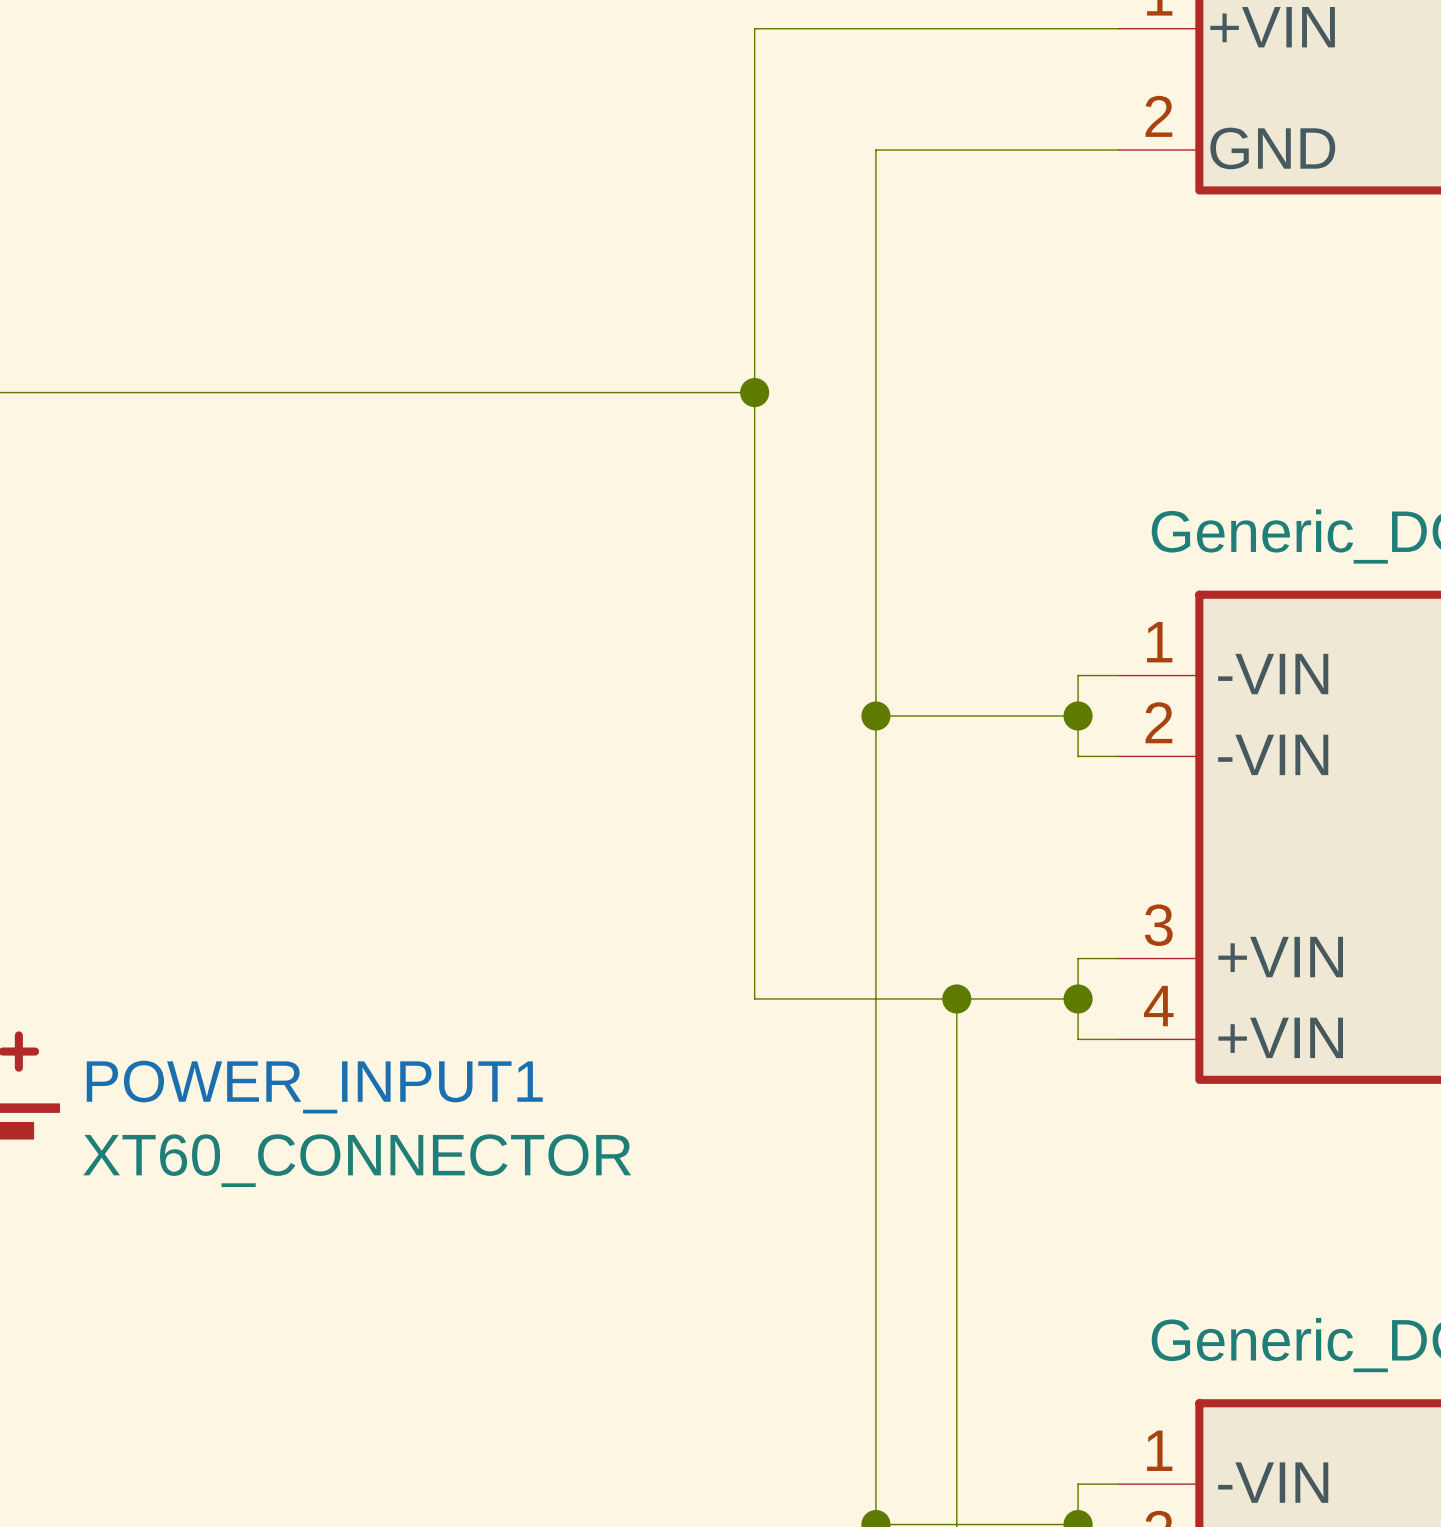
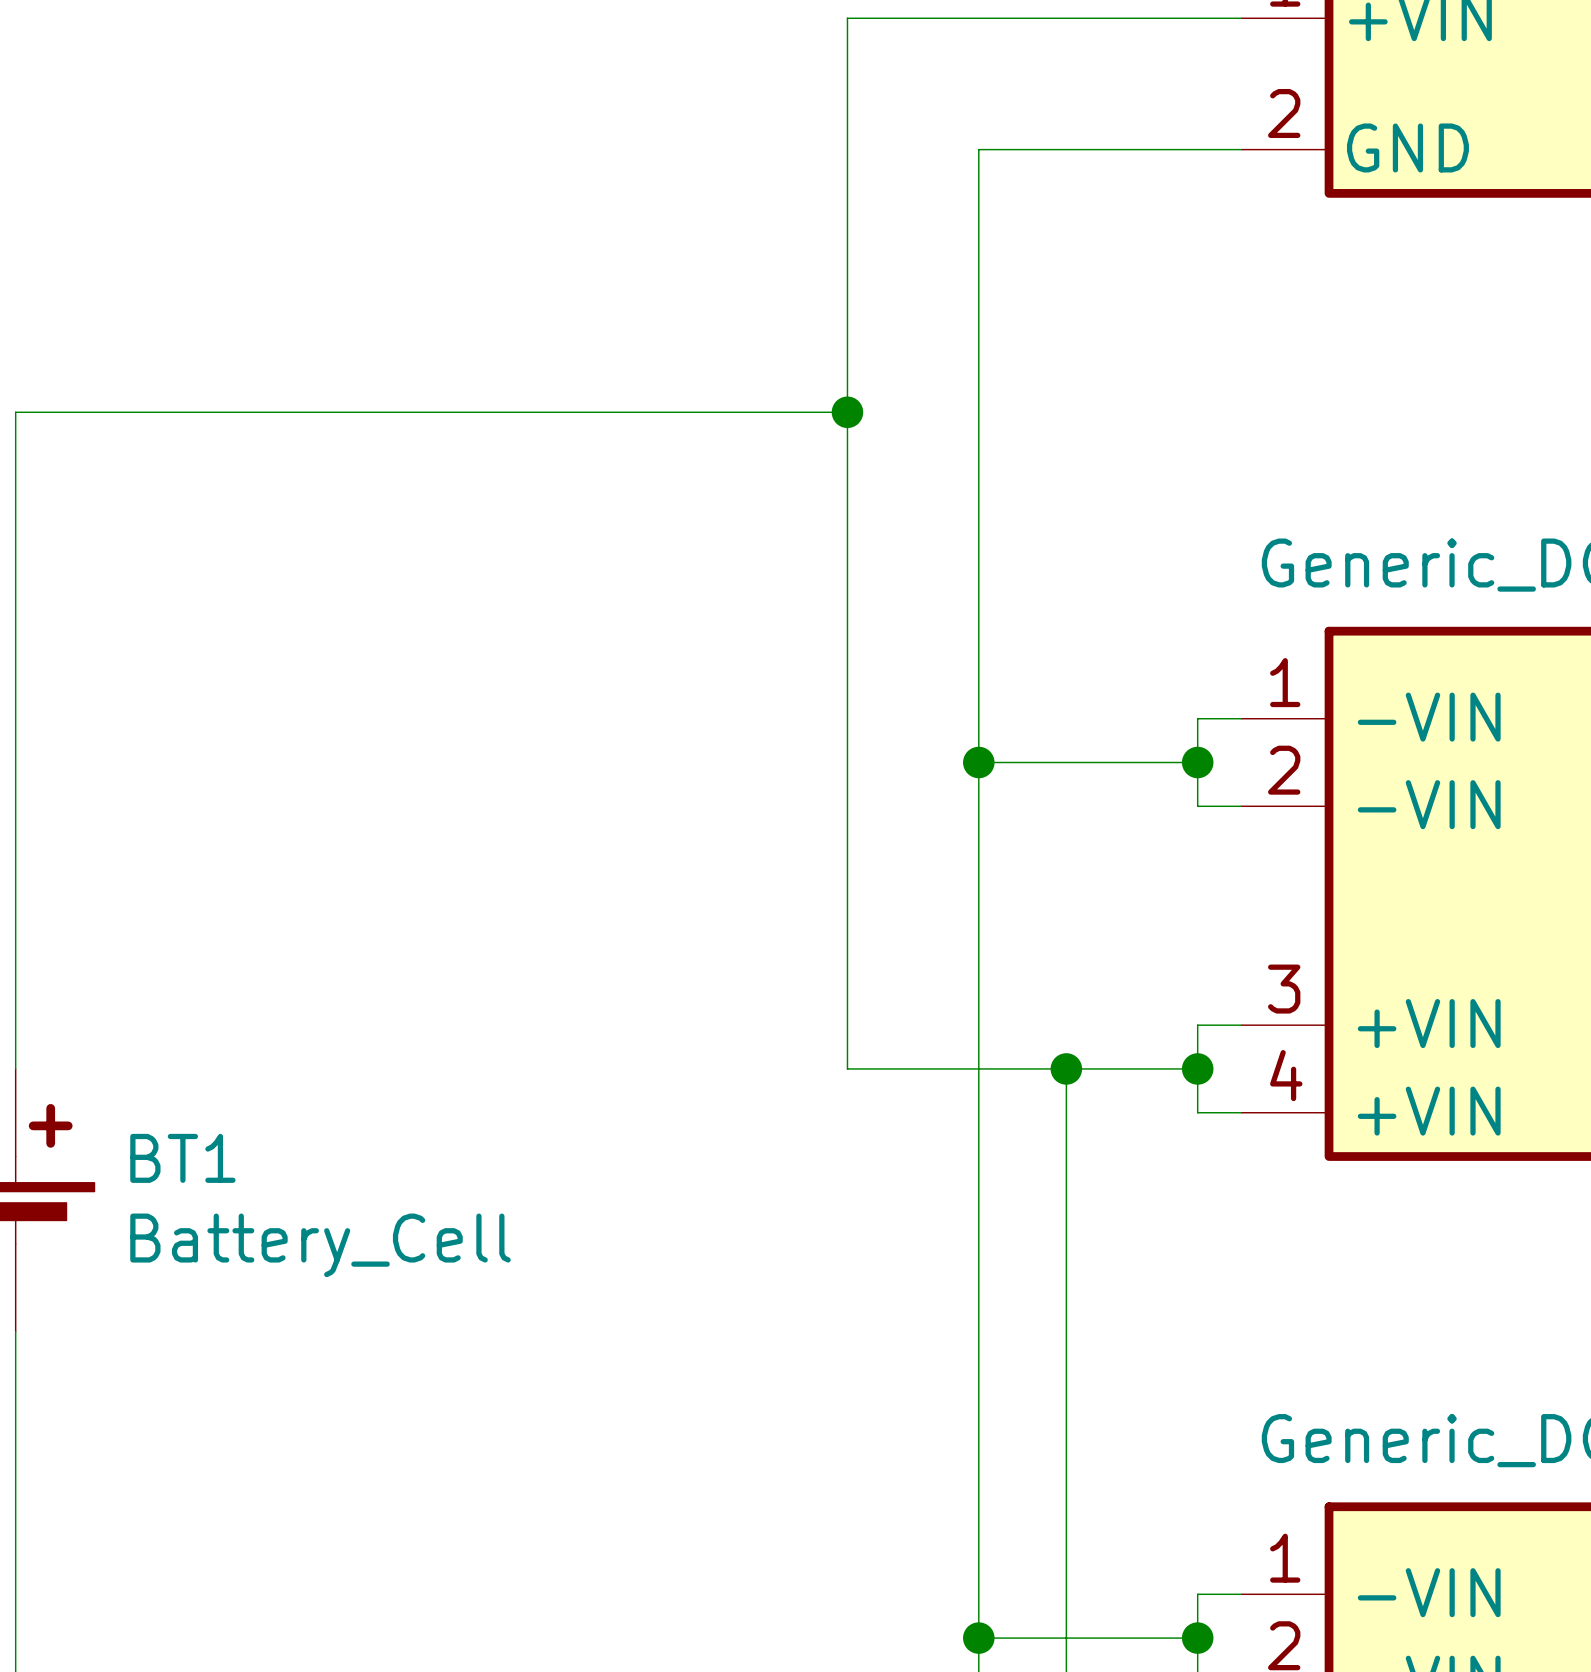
POWER_INPUT1 name: POWER_INPUT1 (314, 1087) -> BT1 (182, 1158)
POWER_INPUT1 value: XT60_CONNECTOR (357, 1160) -> Battery_Cell (320, 1245)

